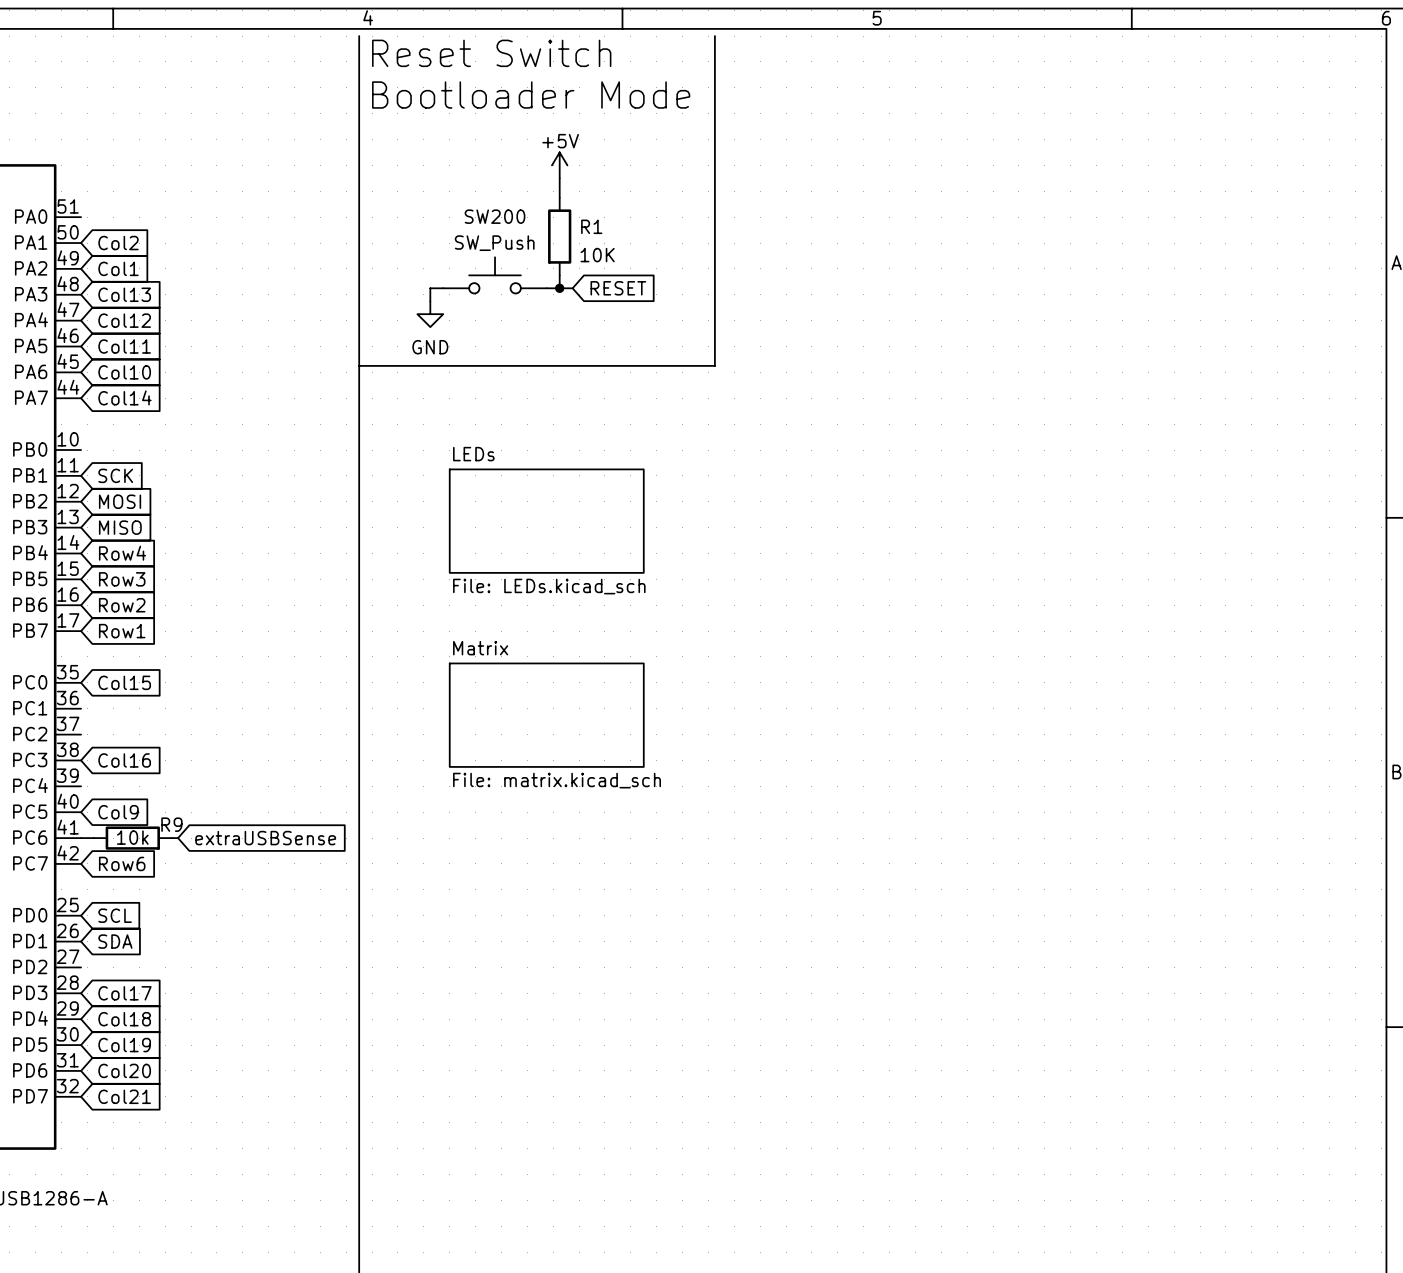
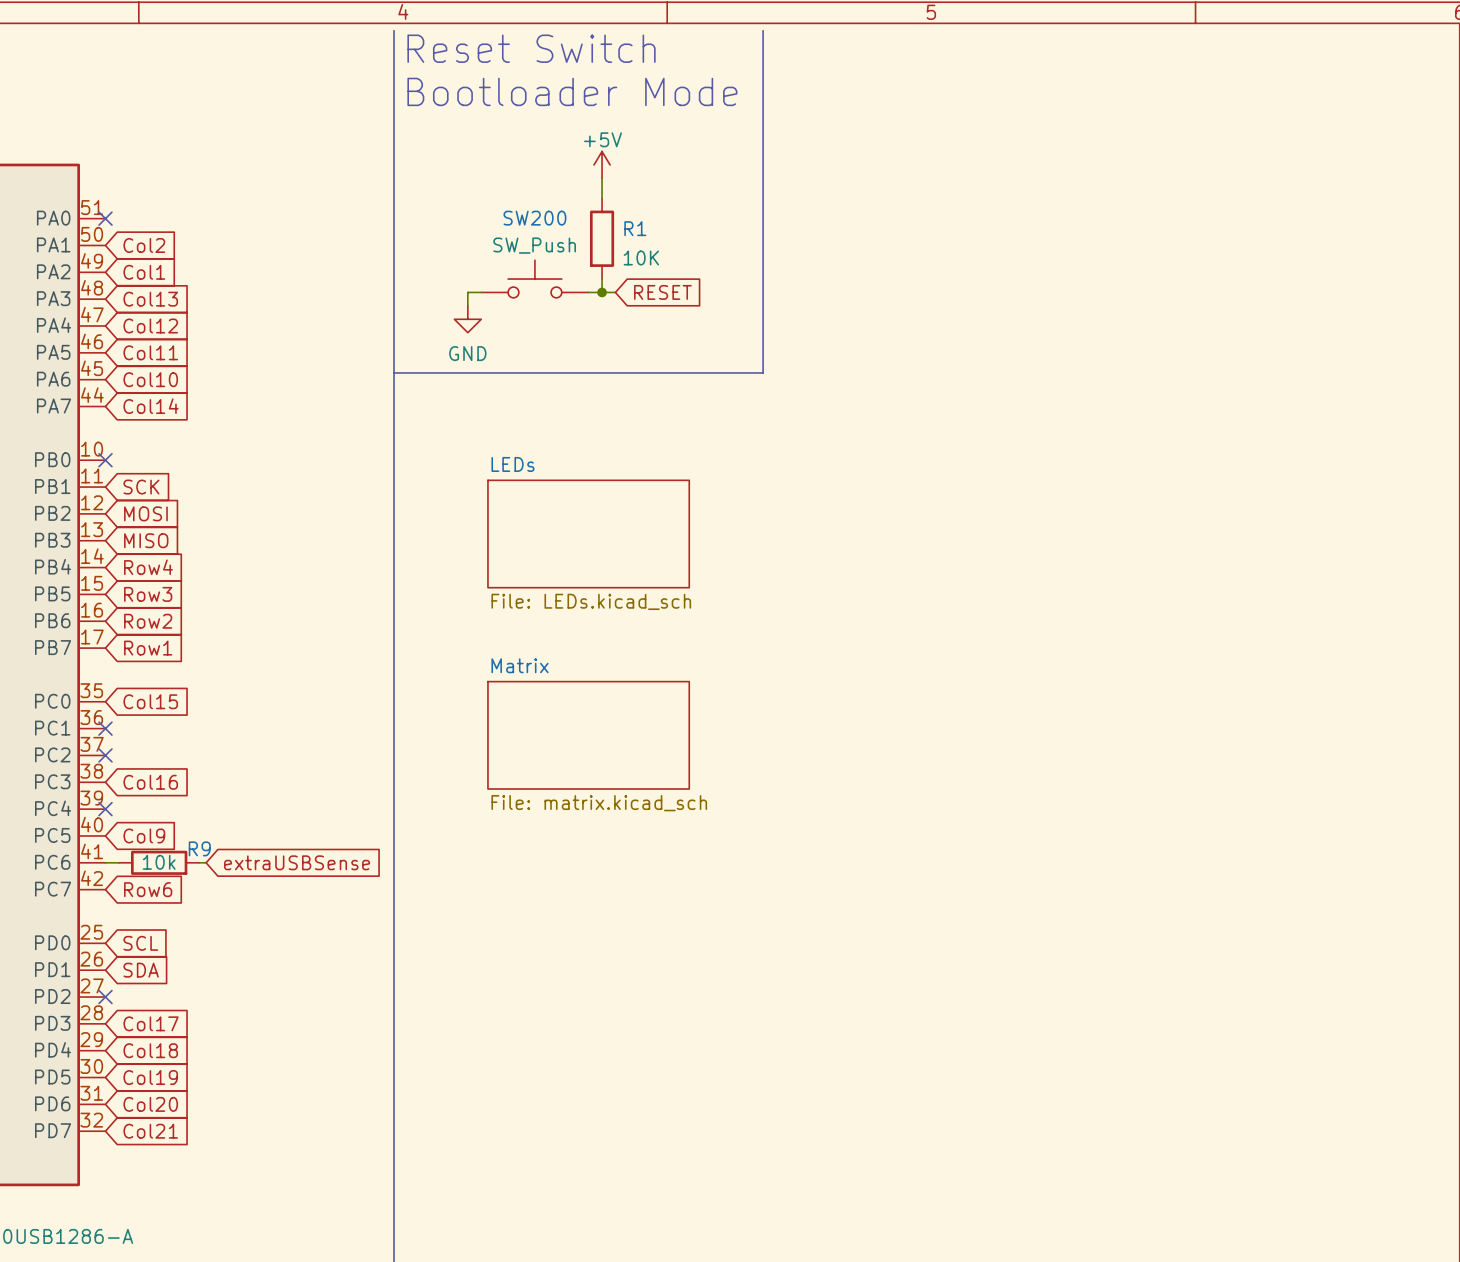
no-connect mark: none -> (105, 218)
no-connect mark: none -> (105, 460)
no-connect mark: none -> (105, 728)
no-connect mark: none -> (105, 755)
no-connect mark: none -> (105, 809)
no-connect mark: none -> (105, 997)

